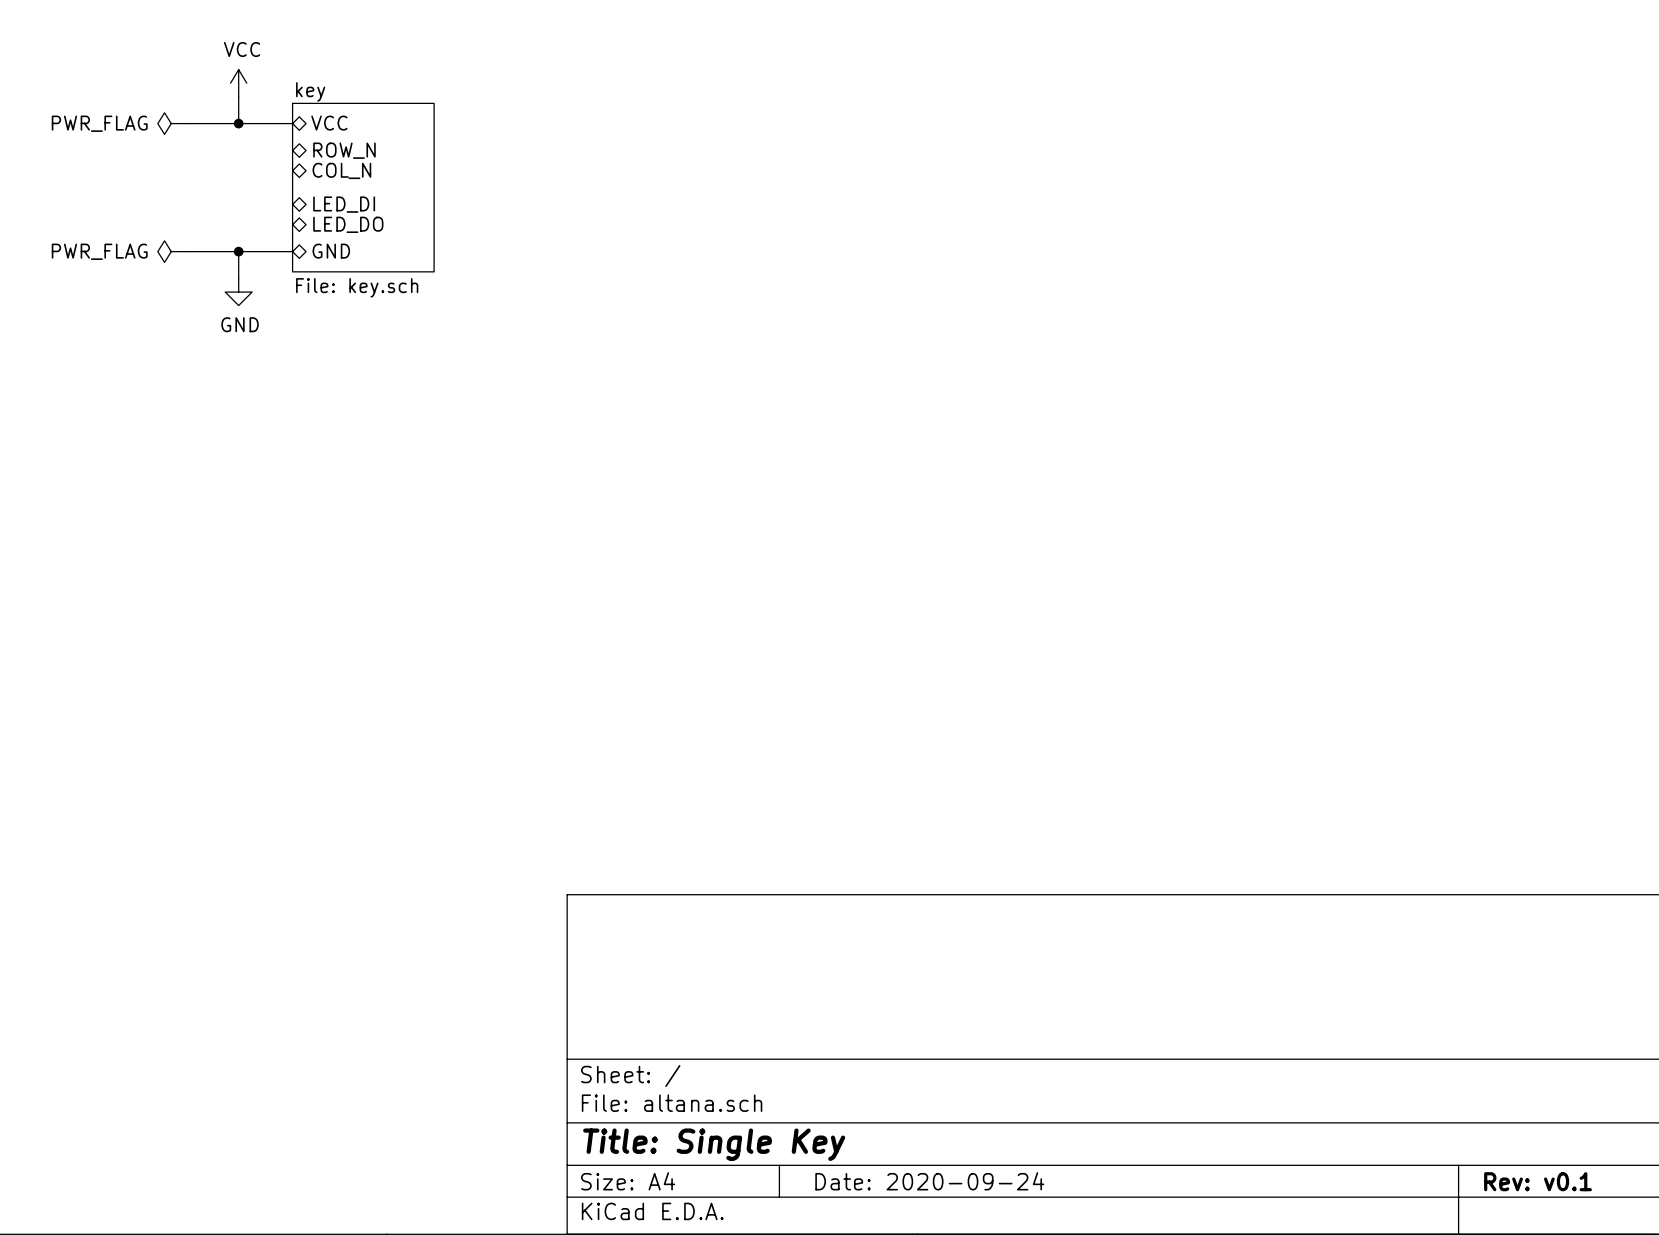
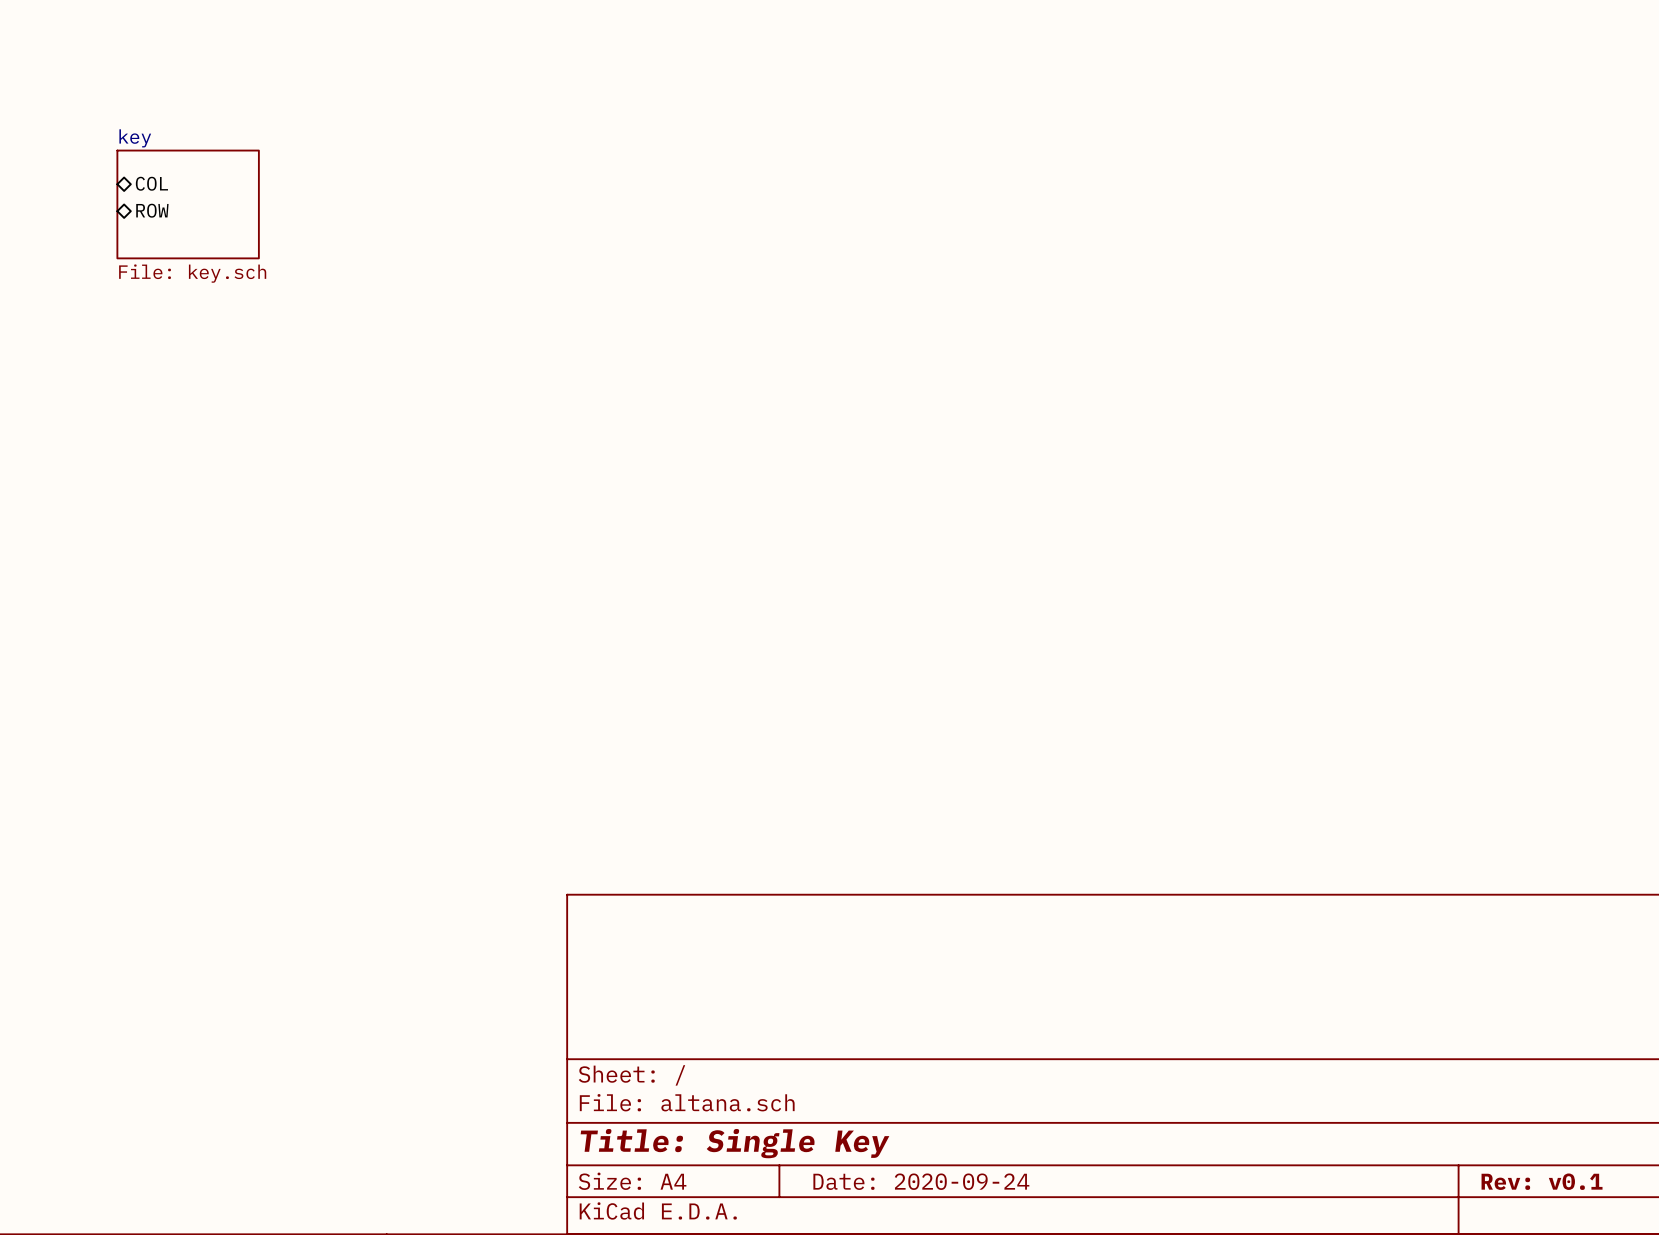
power symbol: VCC (238, 83) -> none
wire: (238, 96) (238, 123) -> none
power symbol: PWR_FLAG (171, 123) -> none
wire: (184, 123) (292, 123) -> none
junction: (238, 123) -> none
sheet pin: VCC (329, 123) -> none
sheet pin: ROW_N (344, 150) -> none
sheet pin: COL_N (341, 170) -> none
sheet pin: none -> COL (151, 183)
sheet key: File: key.sch (363, 187) -> none
sheet key: none -> File: key.sch (188, 204)
sheet pin: LED_DI (344, 204) -> none
sheet pin: none -> ROW (152, 210)
sheet pin: LED_DO (348, 224) -> none
power symbol: PWR_FLAG (171, 251) -> none
wire: (184, 251) (292, 251) -> none
wire: (238, 251) (238, 278) -> none
junction: (238, 251) -> none
sheet pin: GND (331, 251) -> none
power symbol: GND (238, 292) -> none

